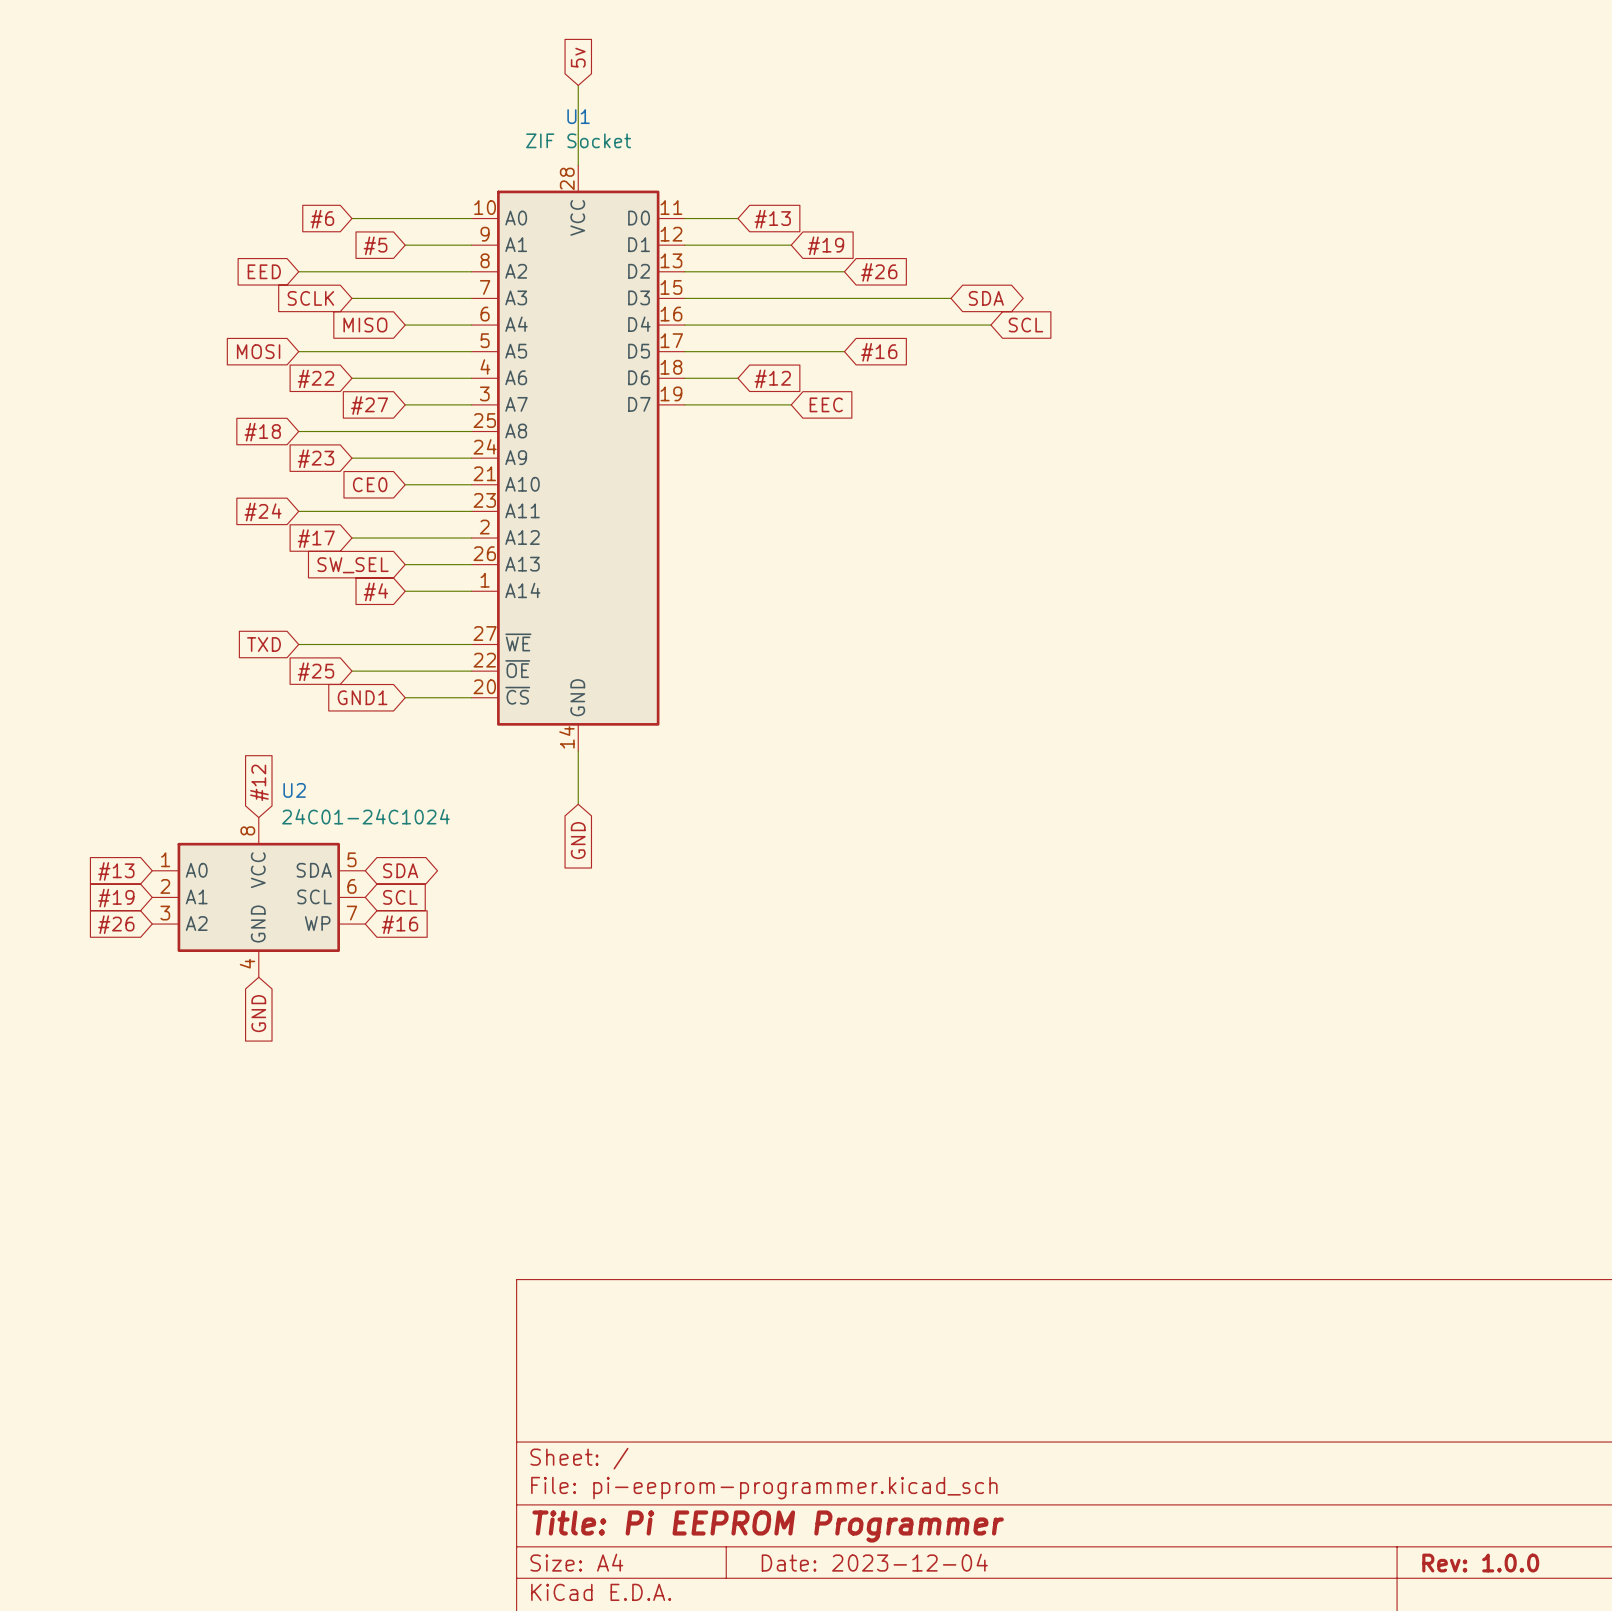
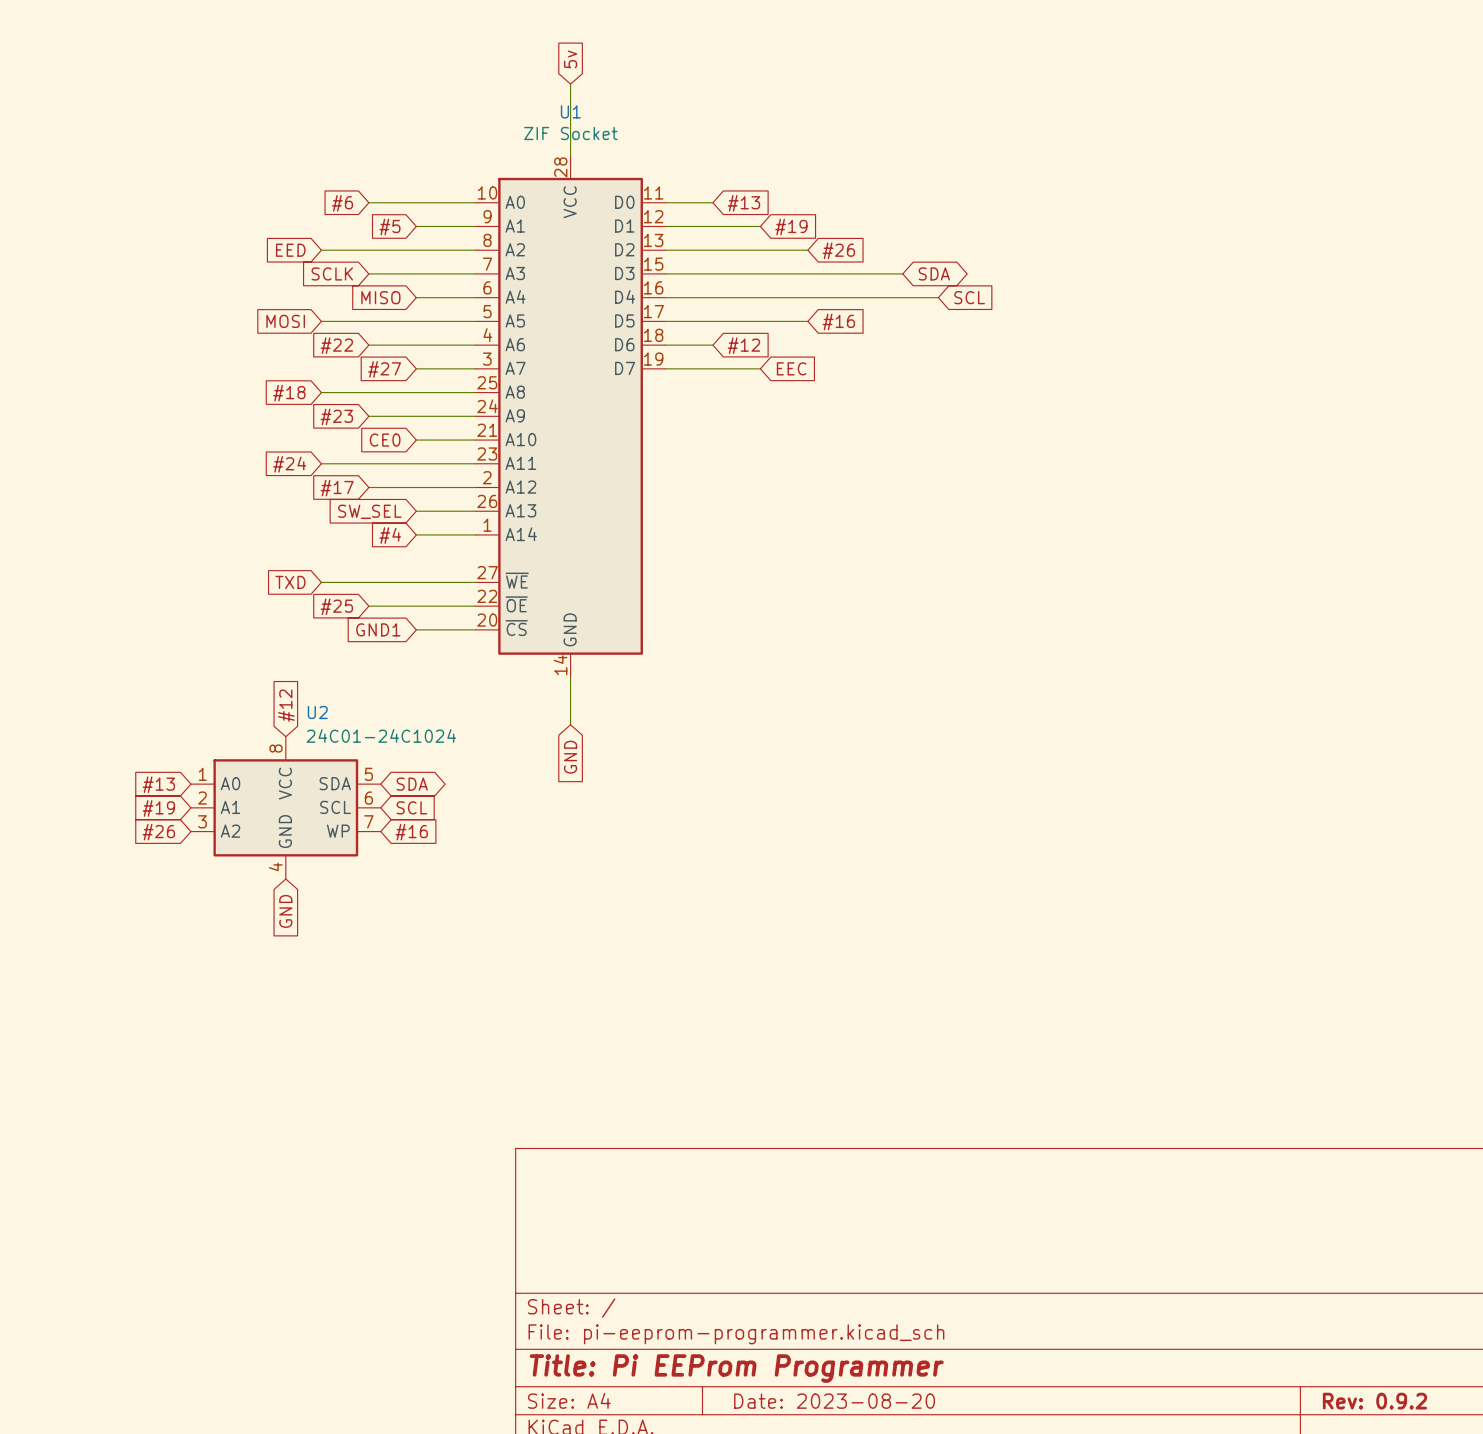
title block: Title: Pi EEPROM Programmer (768, 1526) -> Title: Pi EEProm Programmer (736, 1368)
title block: Date: 2023-12-04 (874, 1562) -> Date: 2023-08-20 (834, 1401)
title block: Rev: 1.0.0 (1480, 1563) -> Rev: 0.9.2 (1374, 1401)

